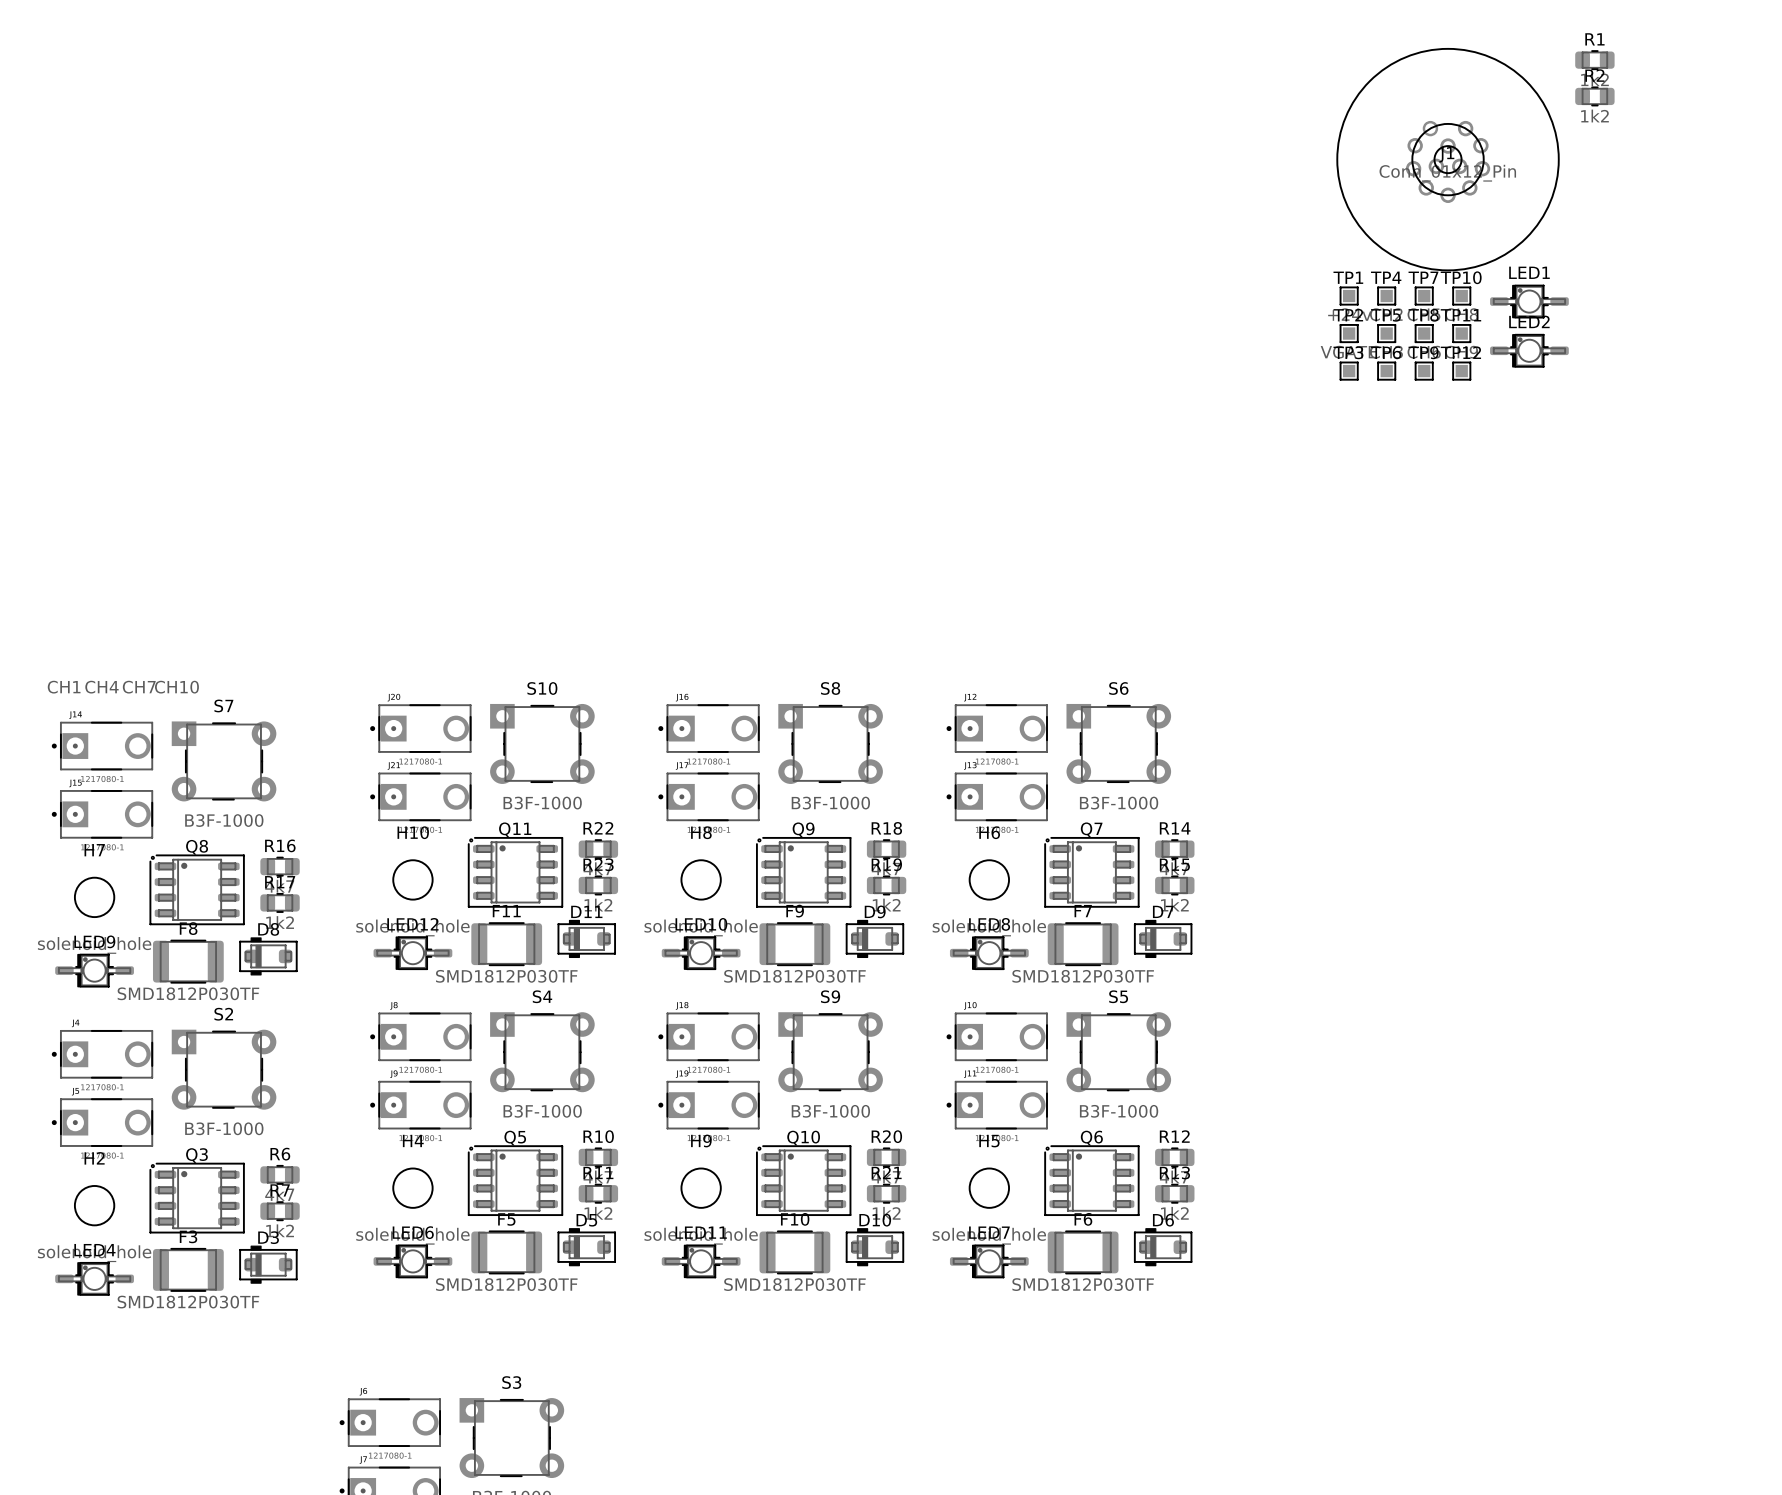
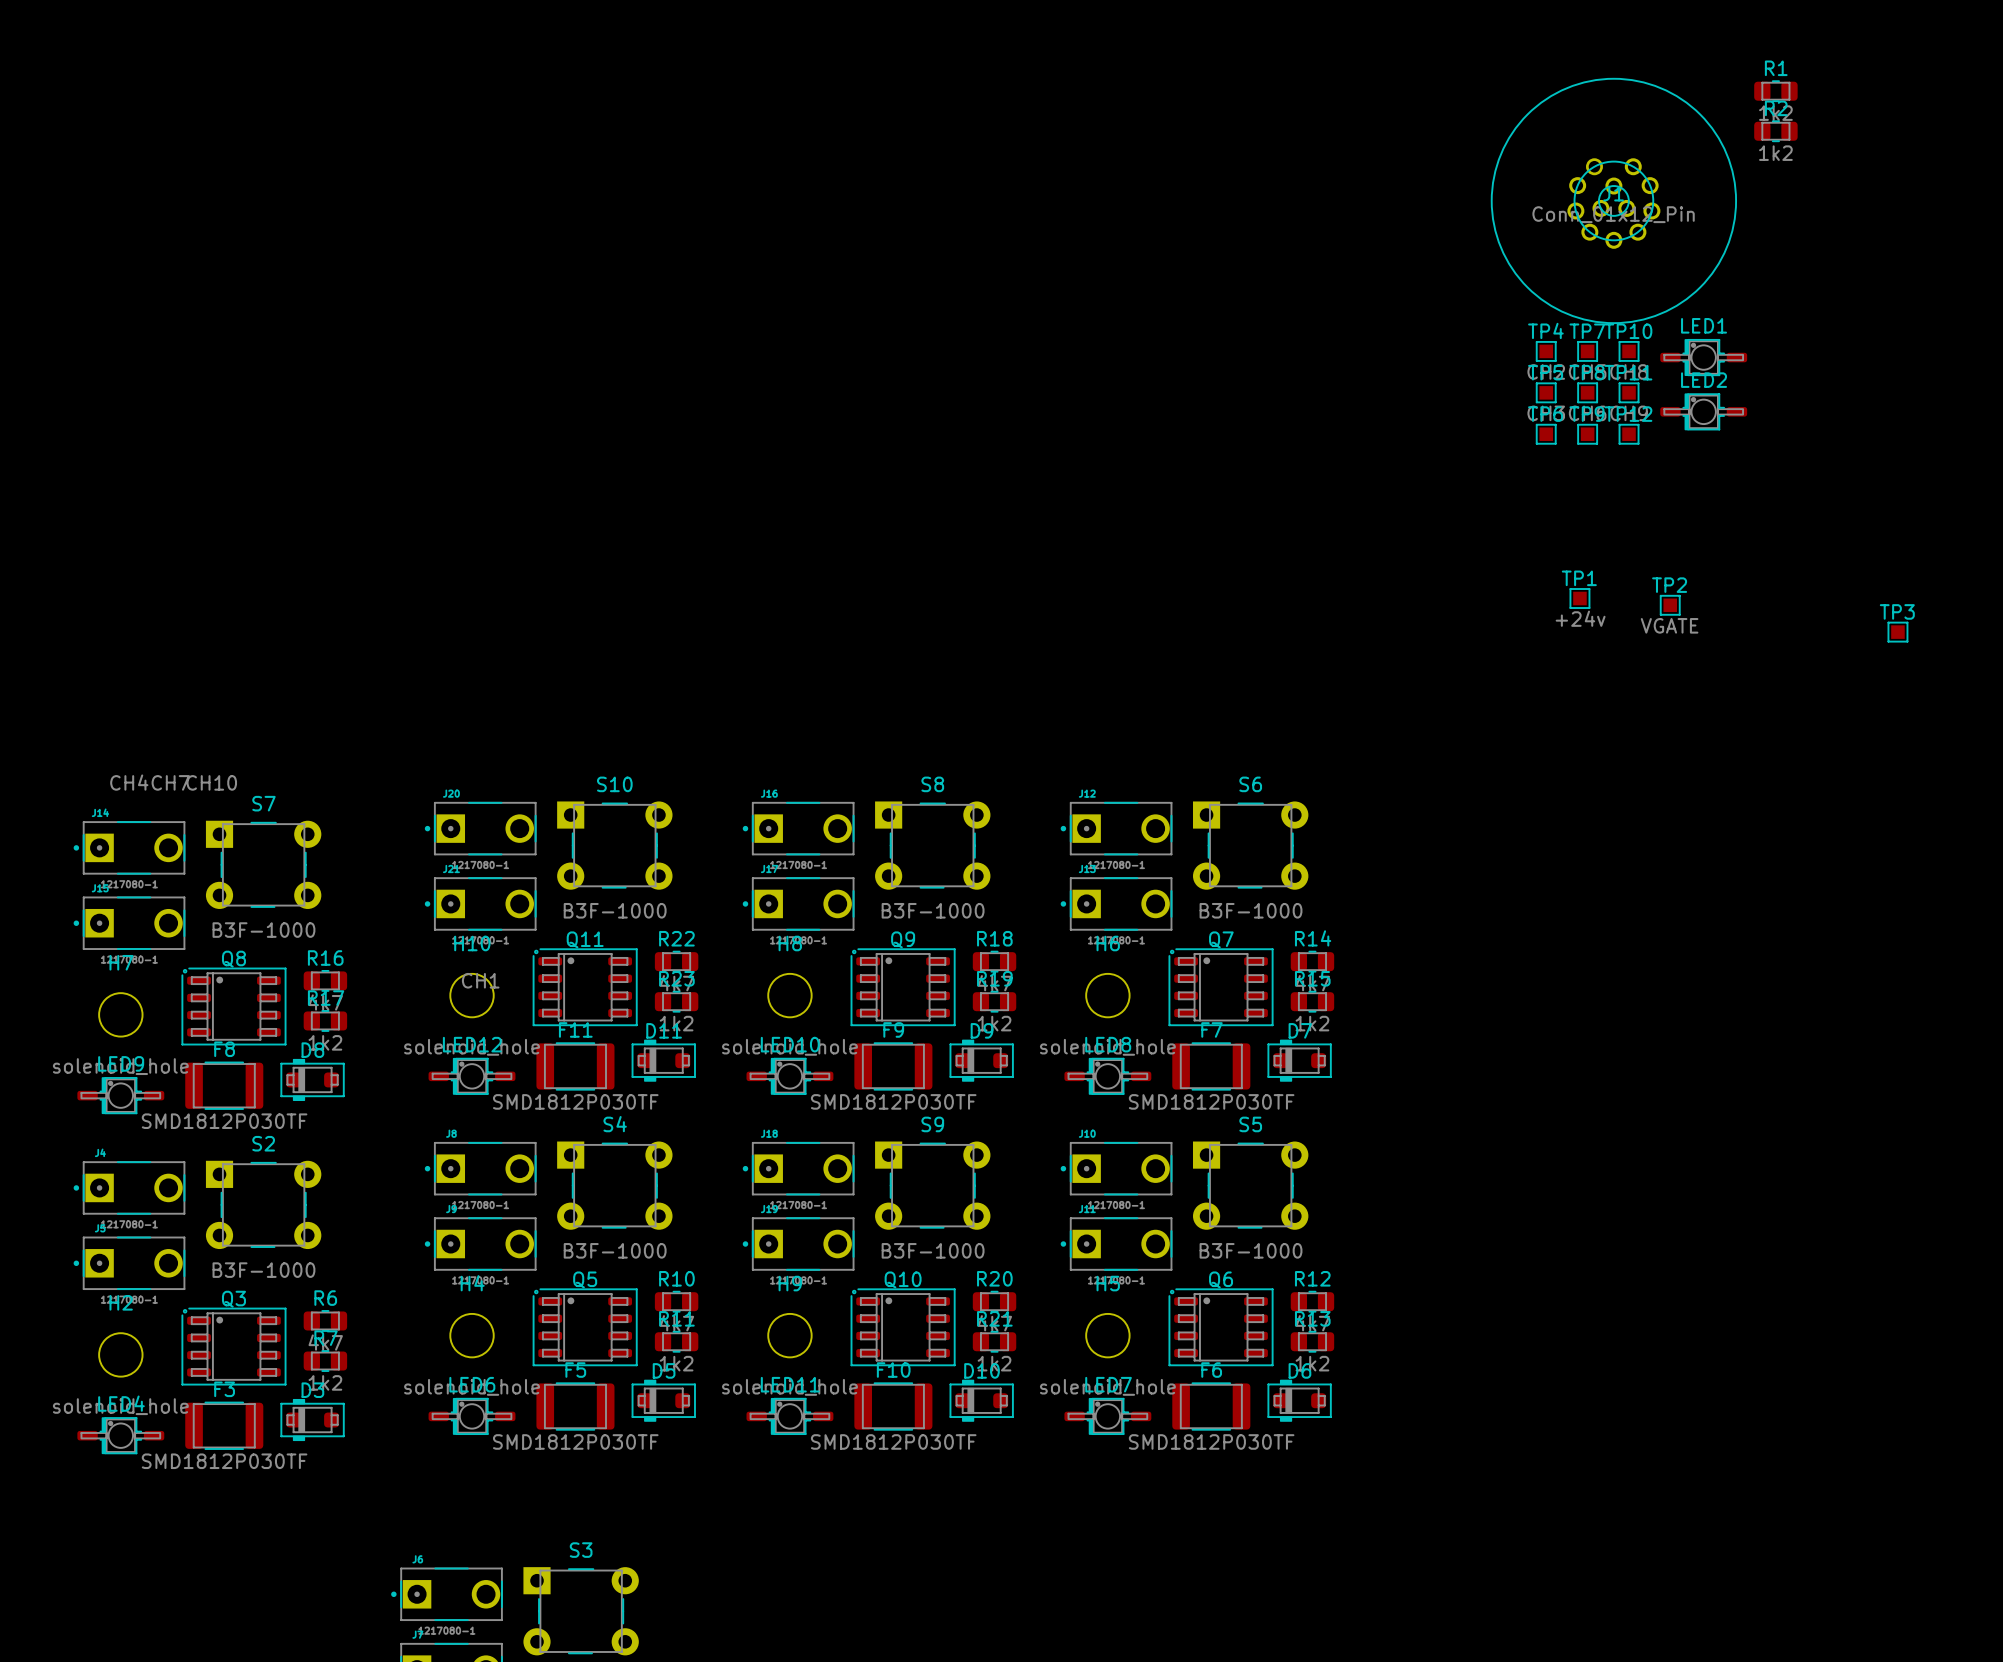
TP1 position: (1349, 296) -> (1579, 598)
TP2 position: (1349, 333) -> (1670, 605)
TP3 position: (1349, 371) -> (1897, 632)

